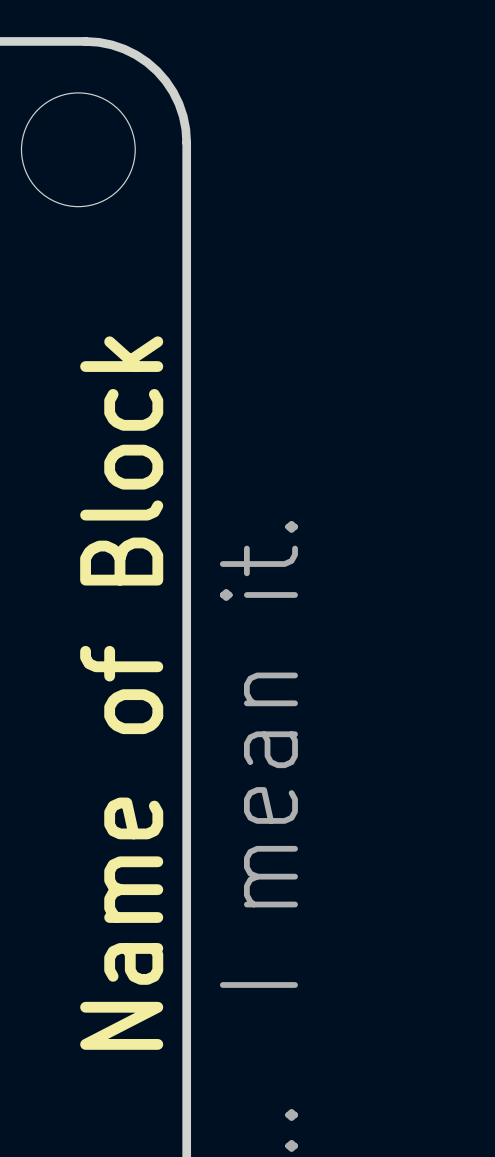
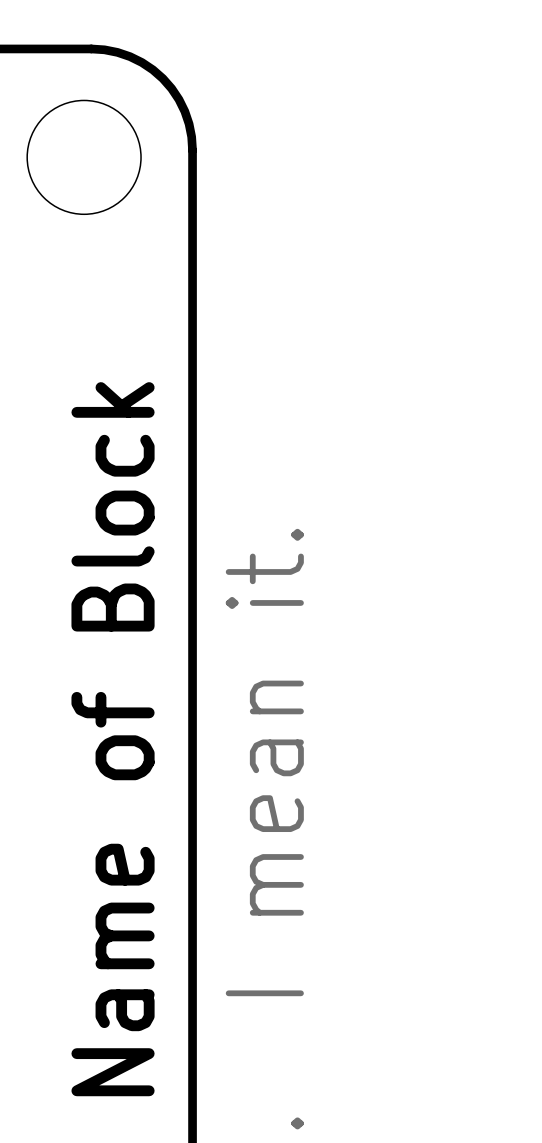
text position: Name of Block (121, 693) -> Name of Block (113, 739)

